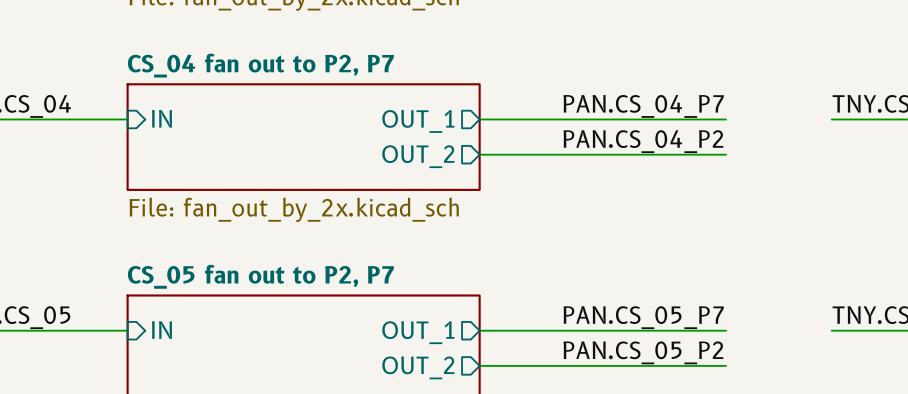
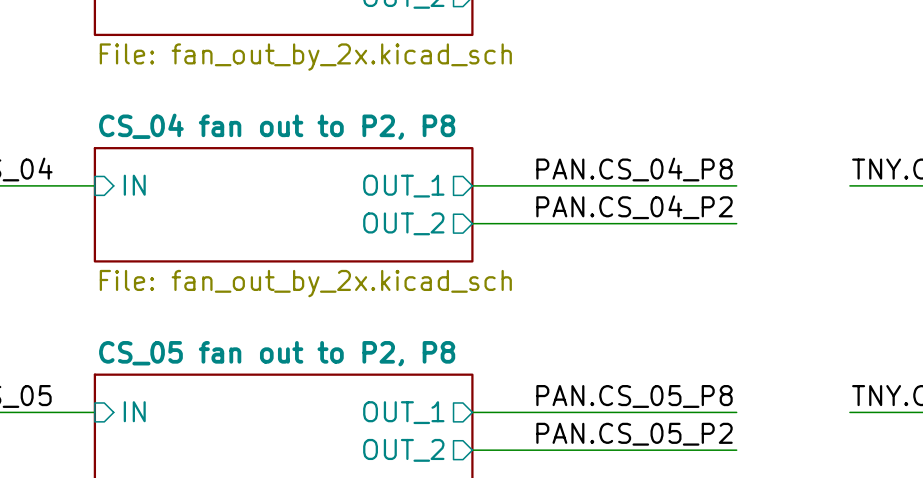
sheet CS_04 fan out to P2, P7 name: CS_04 fan out to P2, P7 (260, 65) -> CS_04 fan out to P2, P8 (277, 126)
label: PAN.CS_04_P7 (643, 106) -> PAN.CS_04_P8 (634, 169)
sheet CS_05 fan out to P2, P7 name: CS_05 fan out to P2, P7 (260, 276) -> CS_05 fan out to P2, P8 (277, 353)
label: PAN.CS_05_P7 (643, 317) -> PAN.CS_05_P8 (634, 396)

